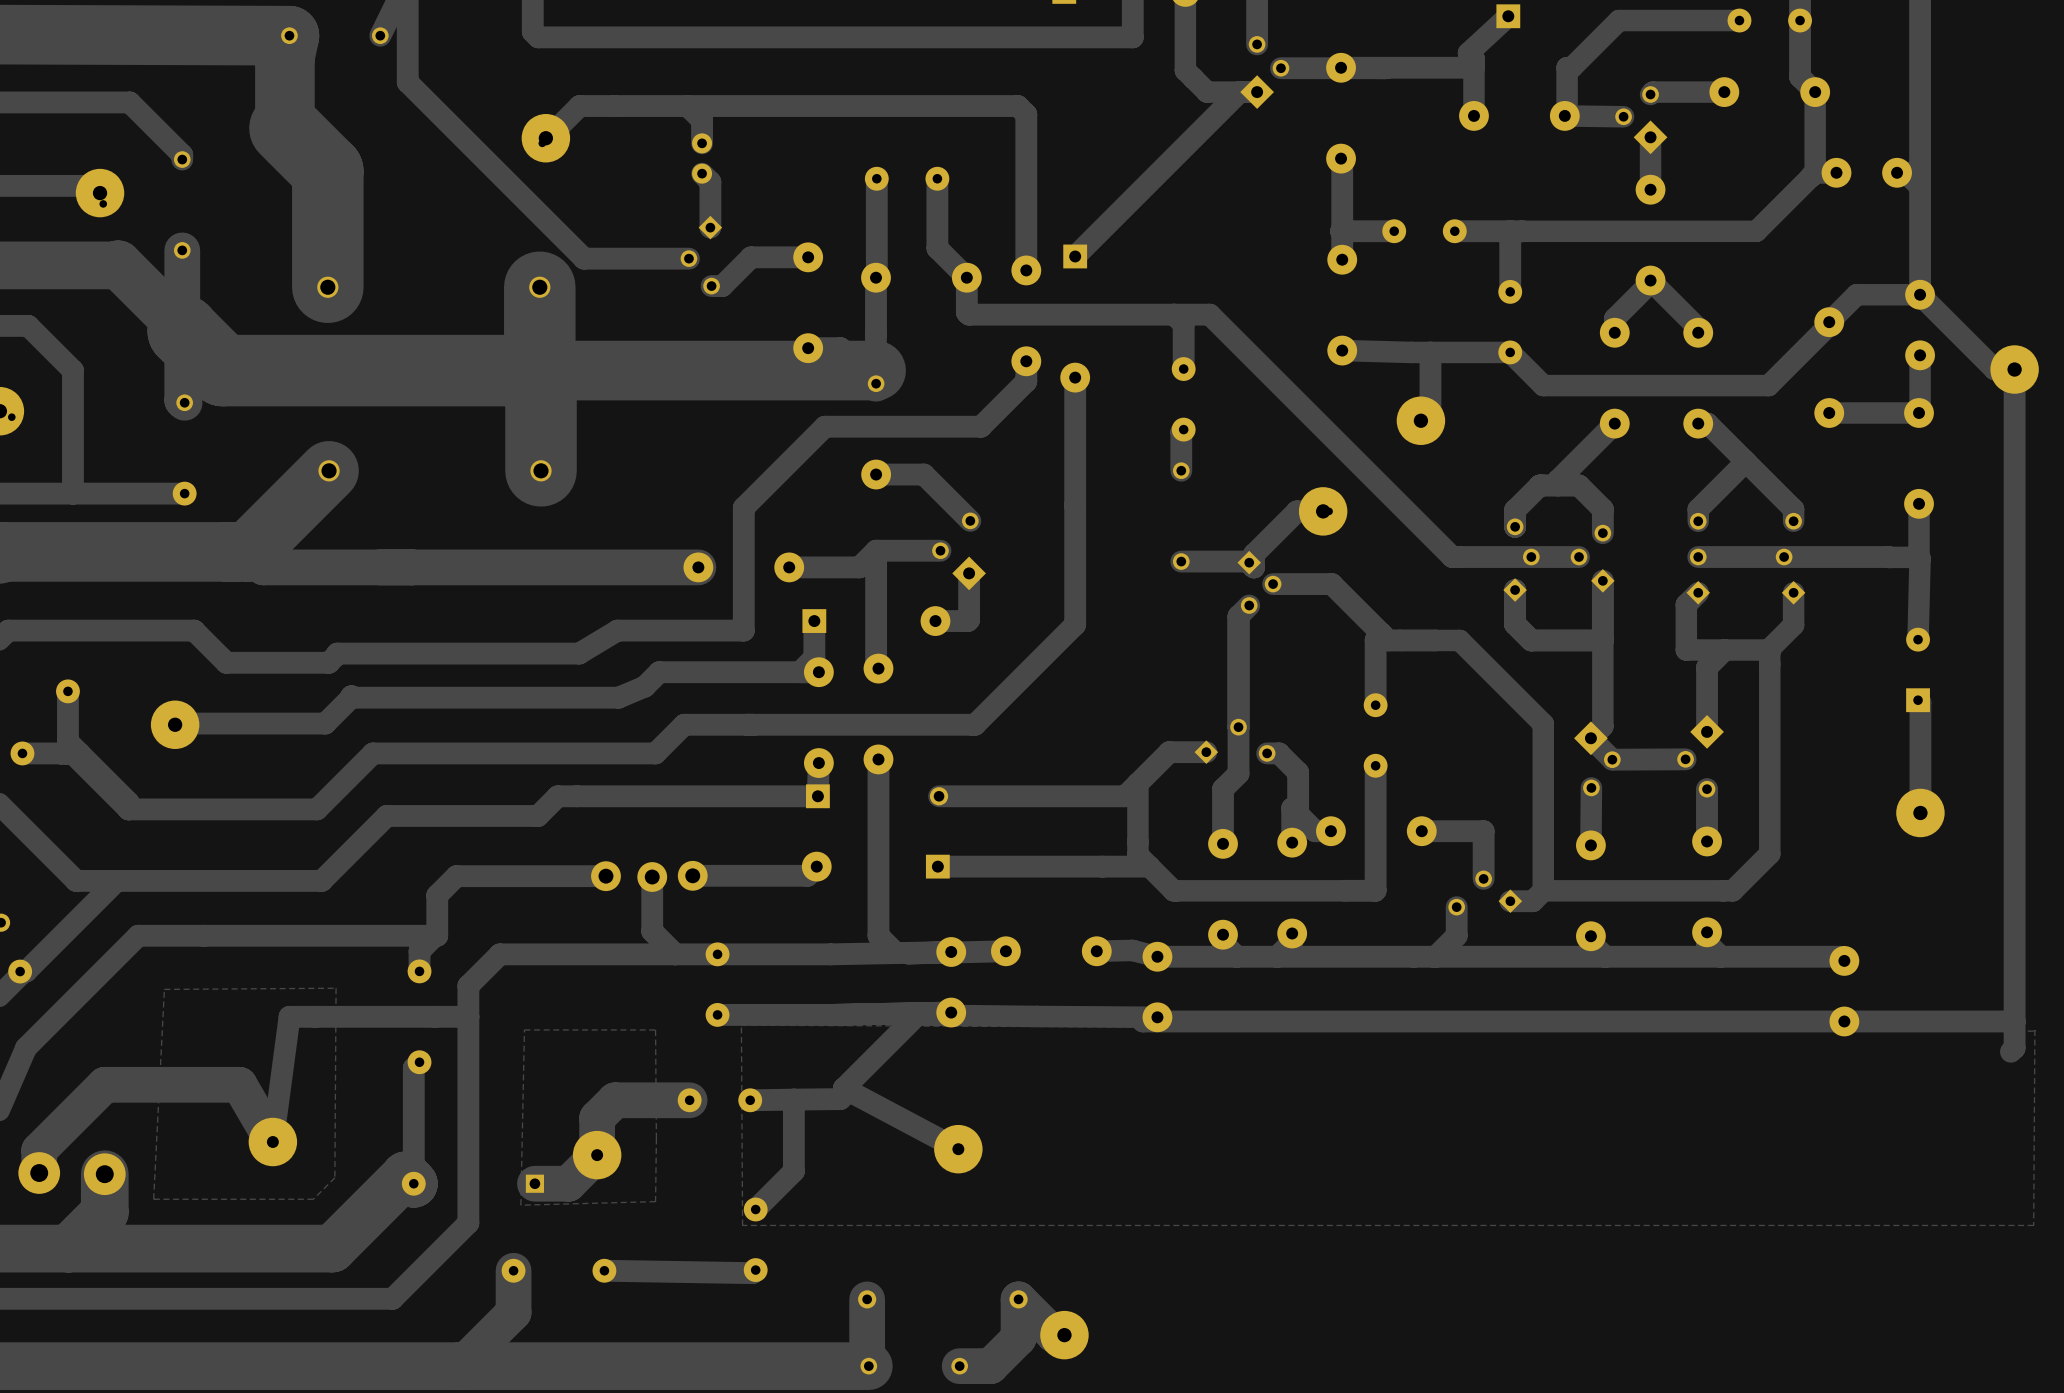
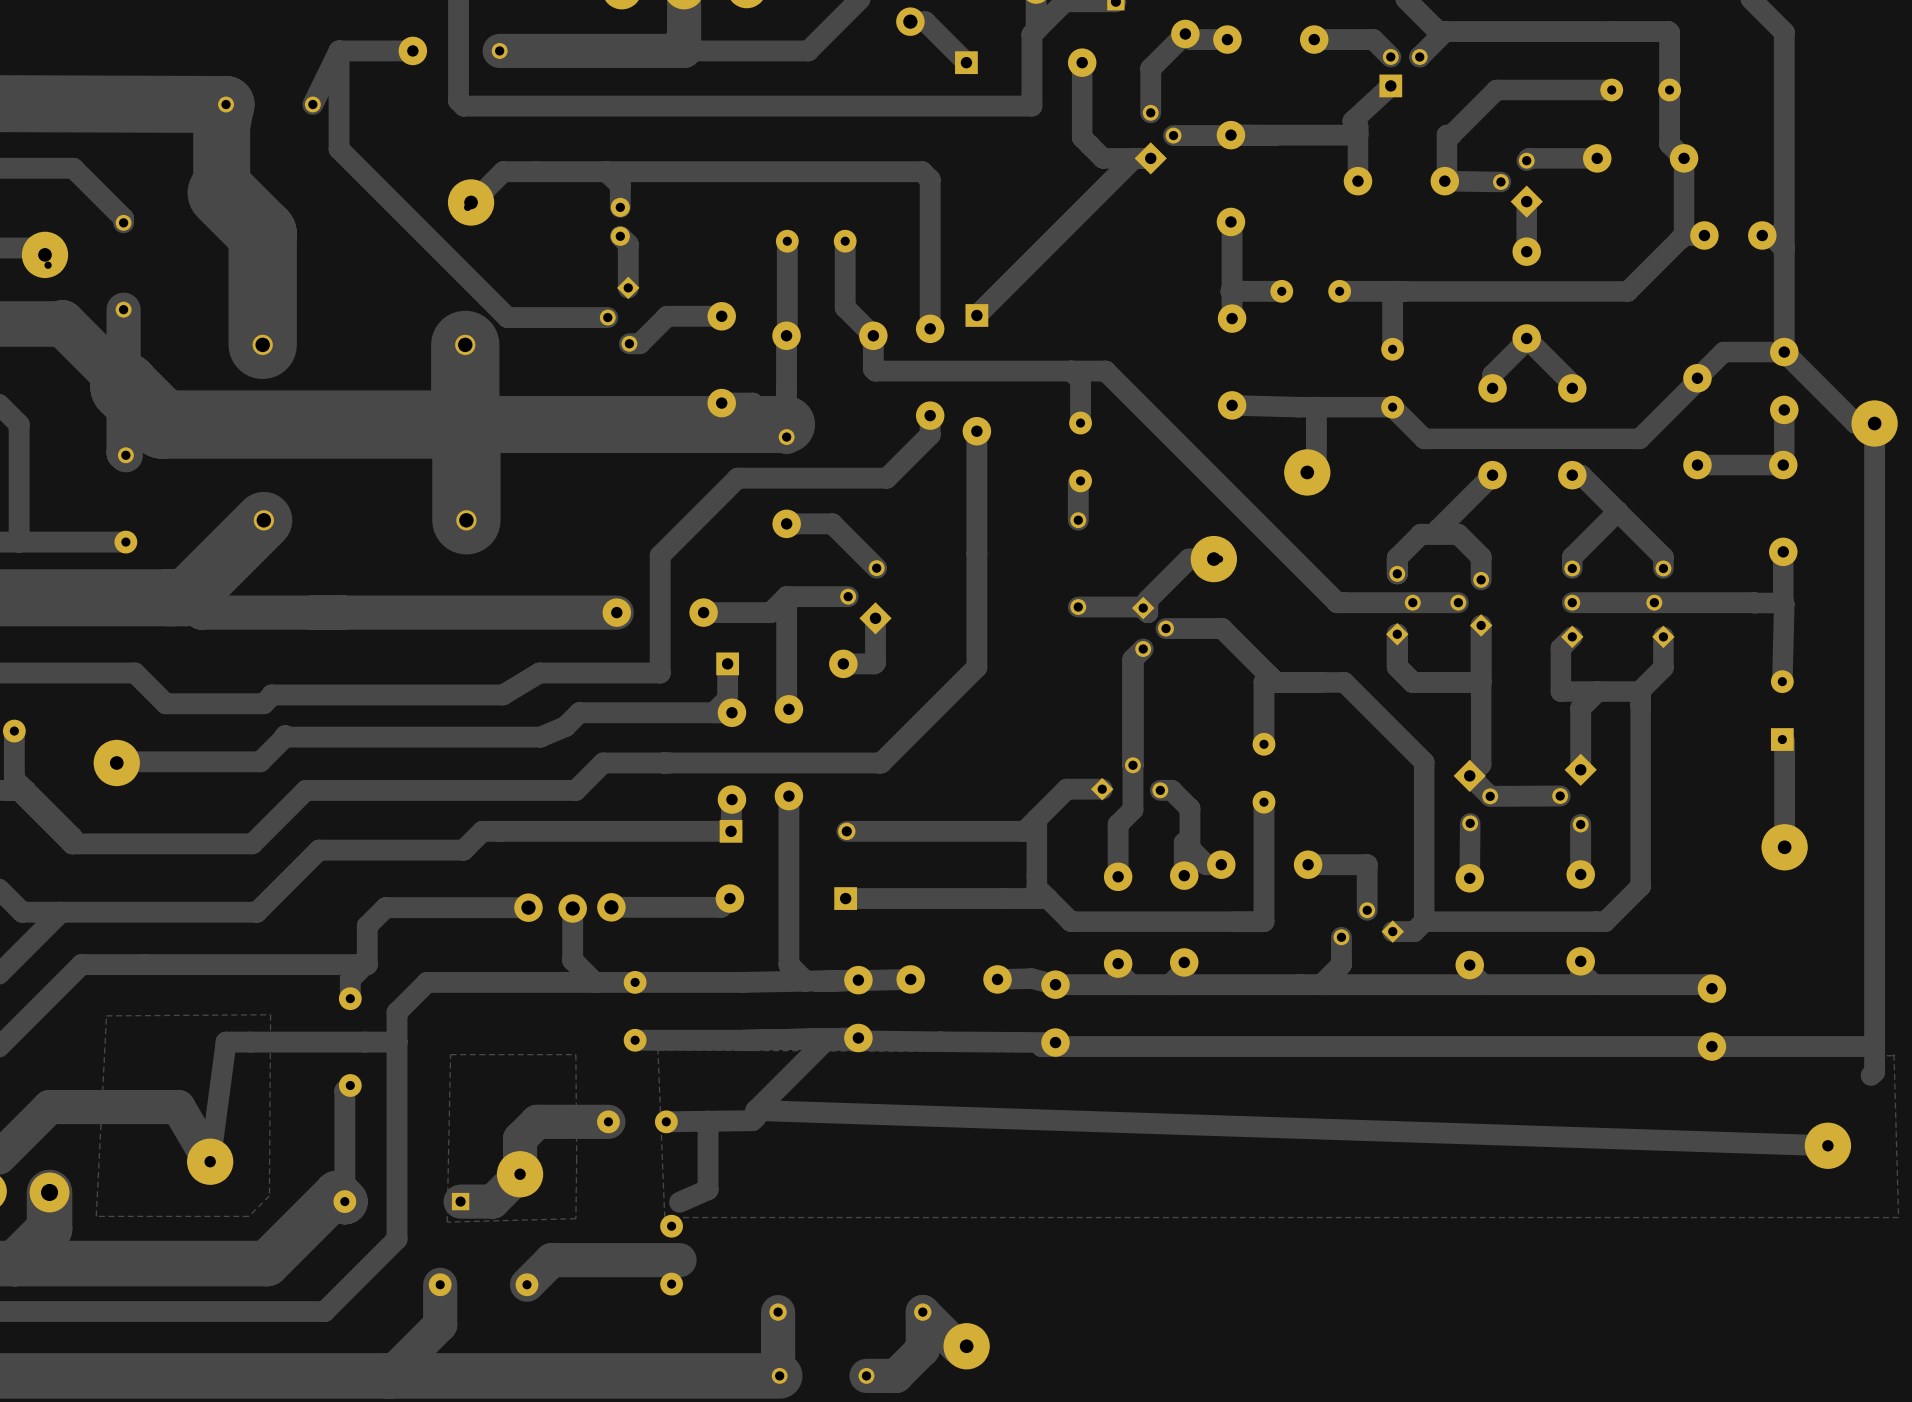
zone outline: (741, 1025) (742, 1225) (2033, 1225) (2034, 1029) -> (657, 1050) (664, 1217) (1898, 1217) (1894, 1054)
track: (843, 1088) (958, 1149) -> (755, 1110) (1827, 1145)
part: none -> (1827, 1145)
part: (958, 1149) -> none
track: (793, 1171) (755, 1209) -> (708, 1189) (679, 1202)
track: (755, 1270) (752, 1273) (604, 1270) -> (679, 1260) (551, 1260) (527, 1284)

